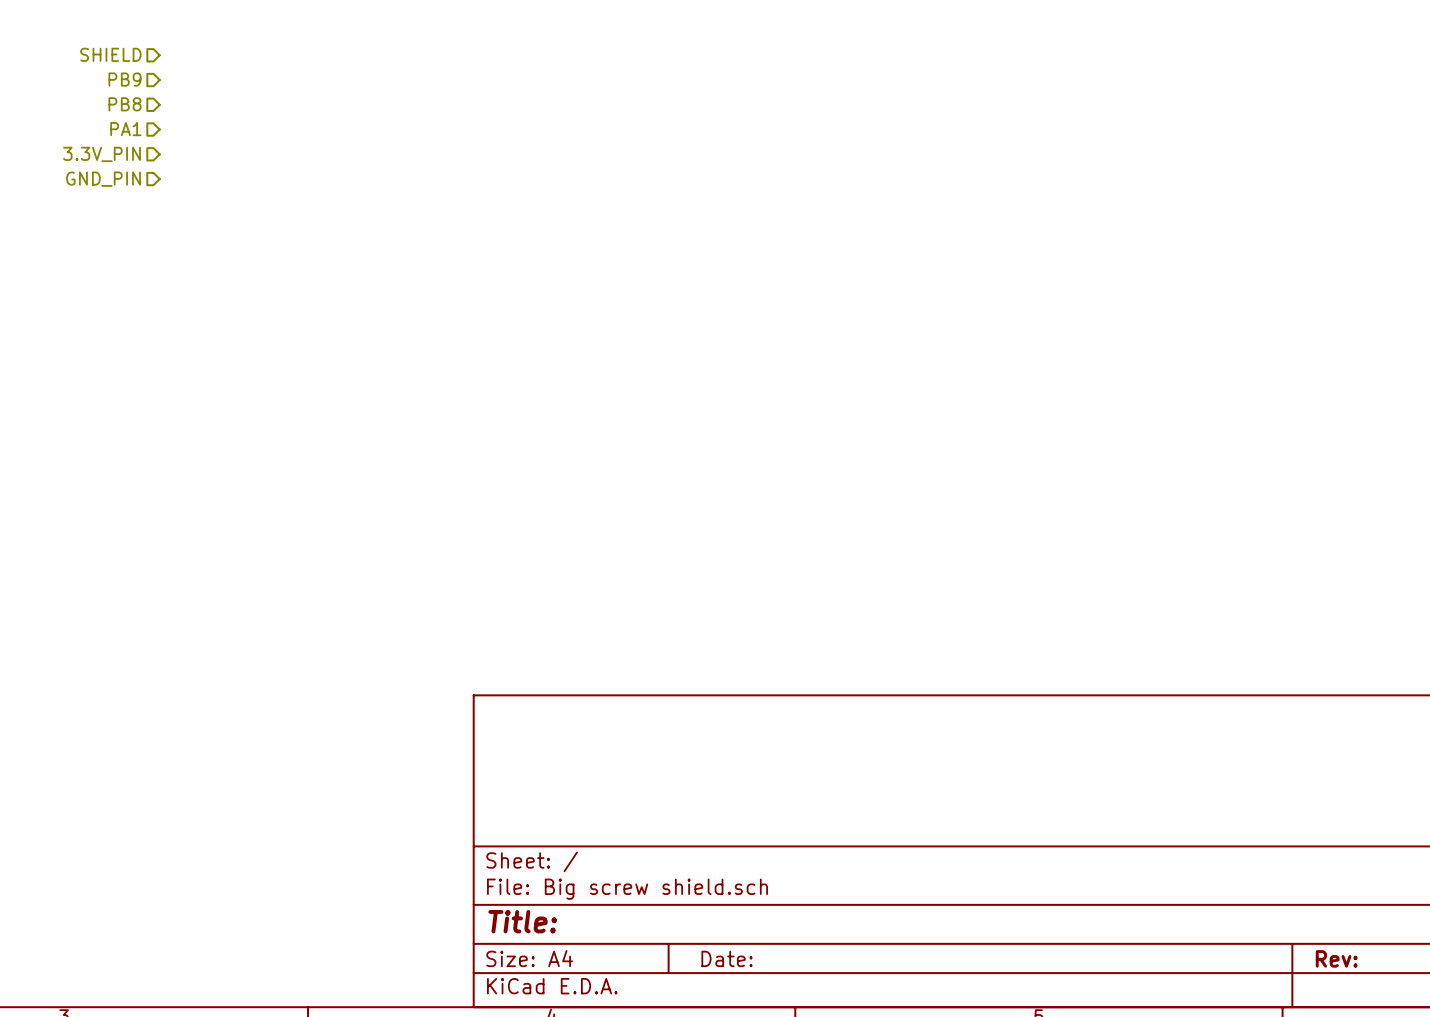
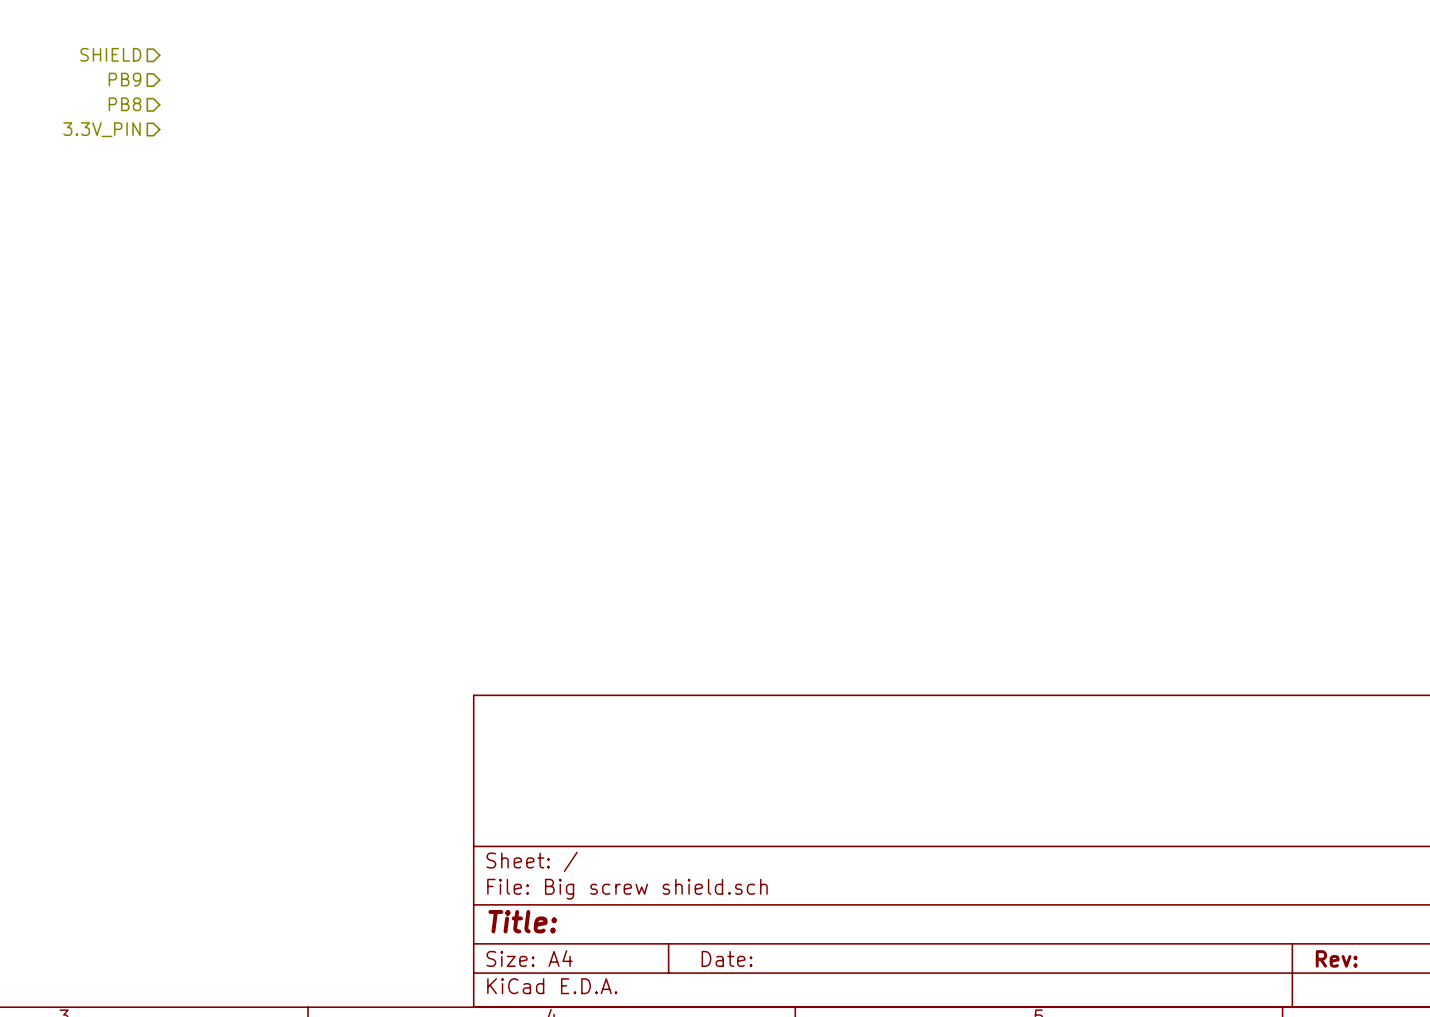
hierarchical label: PA1 (125, 129) -> 3.3V_PIN (102, 129)
hierarchical label: 3.3V_PIN (102, 154) -> none
hierarchical label: GND_PIN (103, 179) -> none

